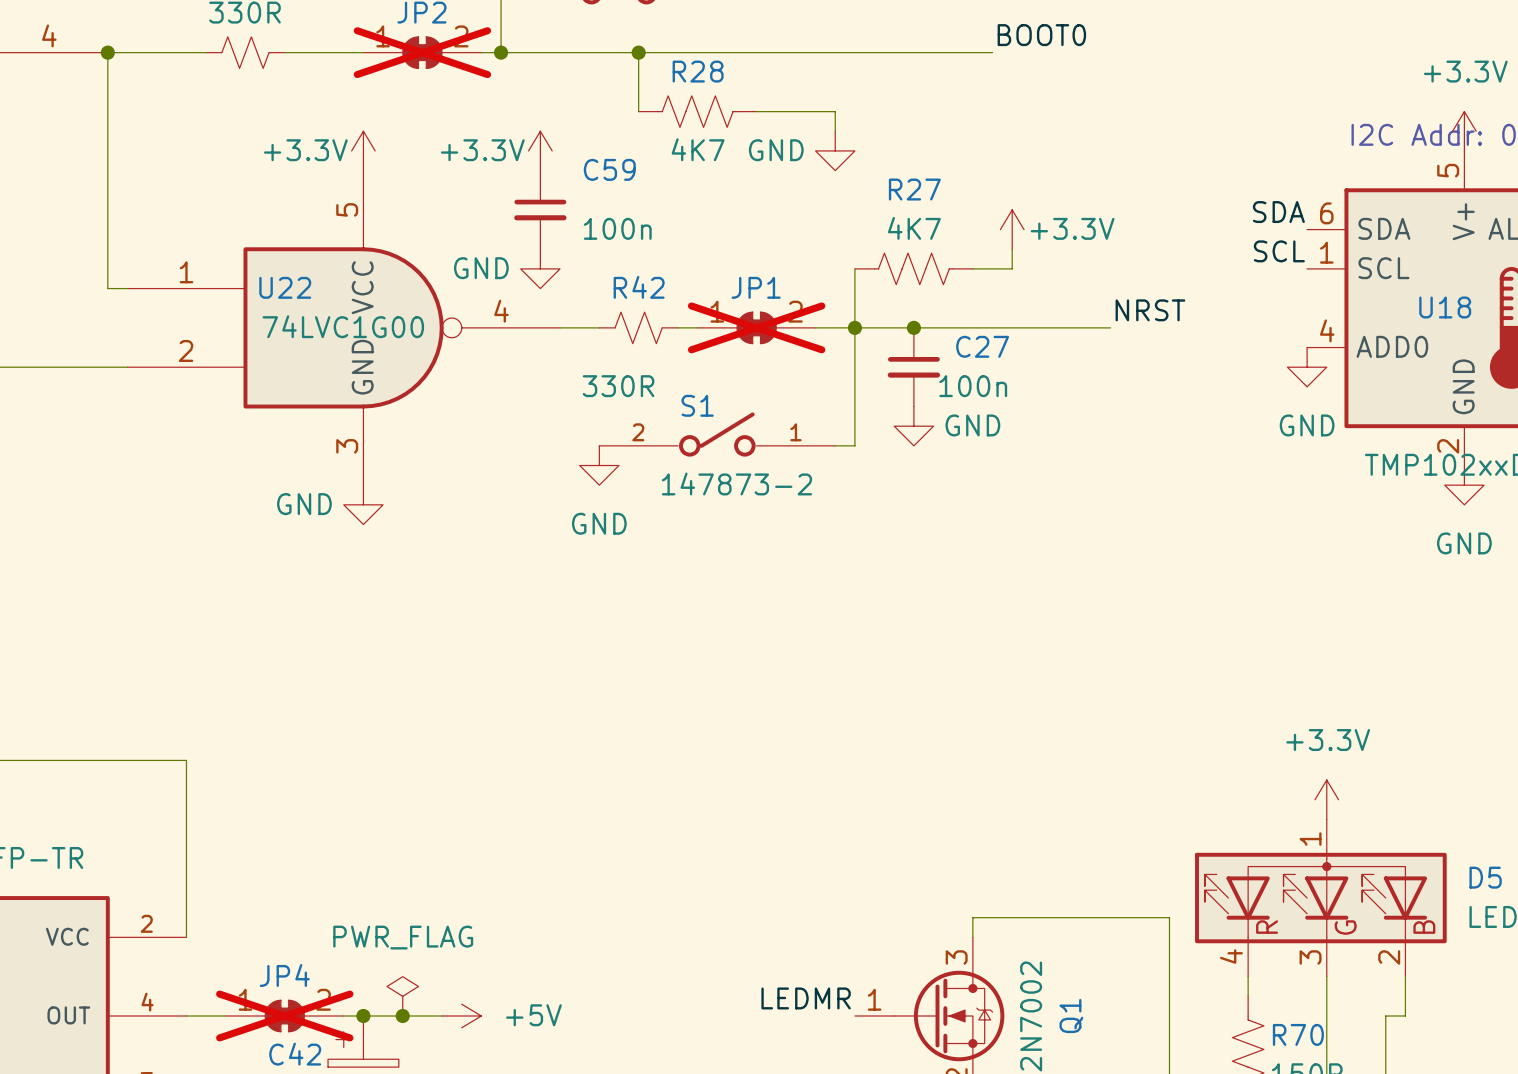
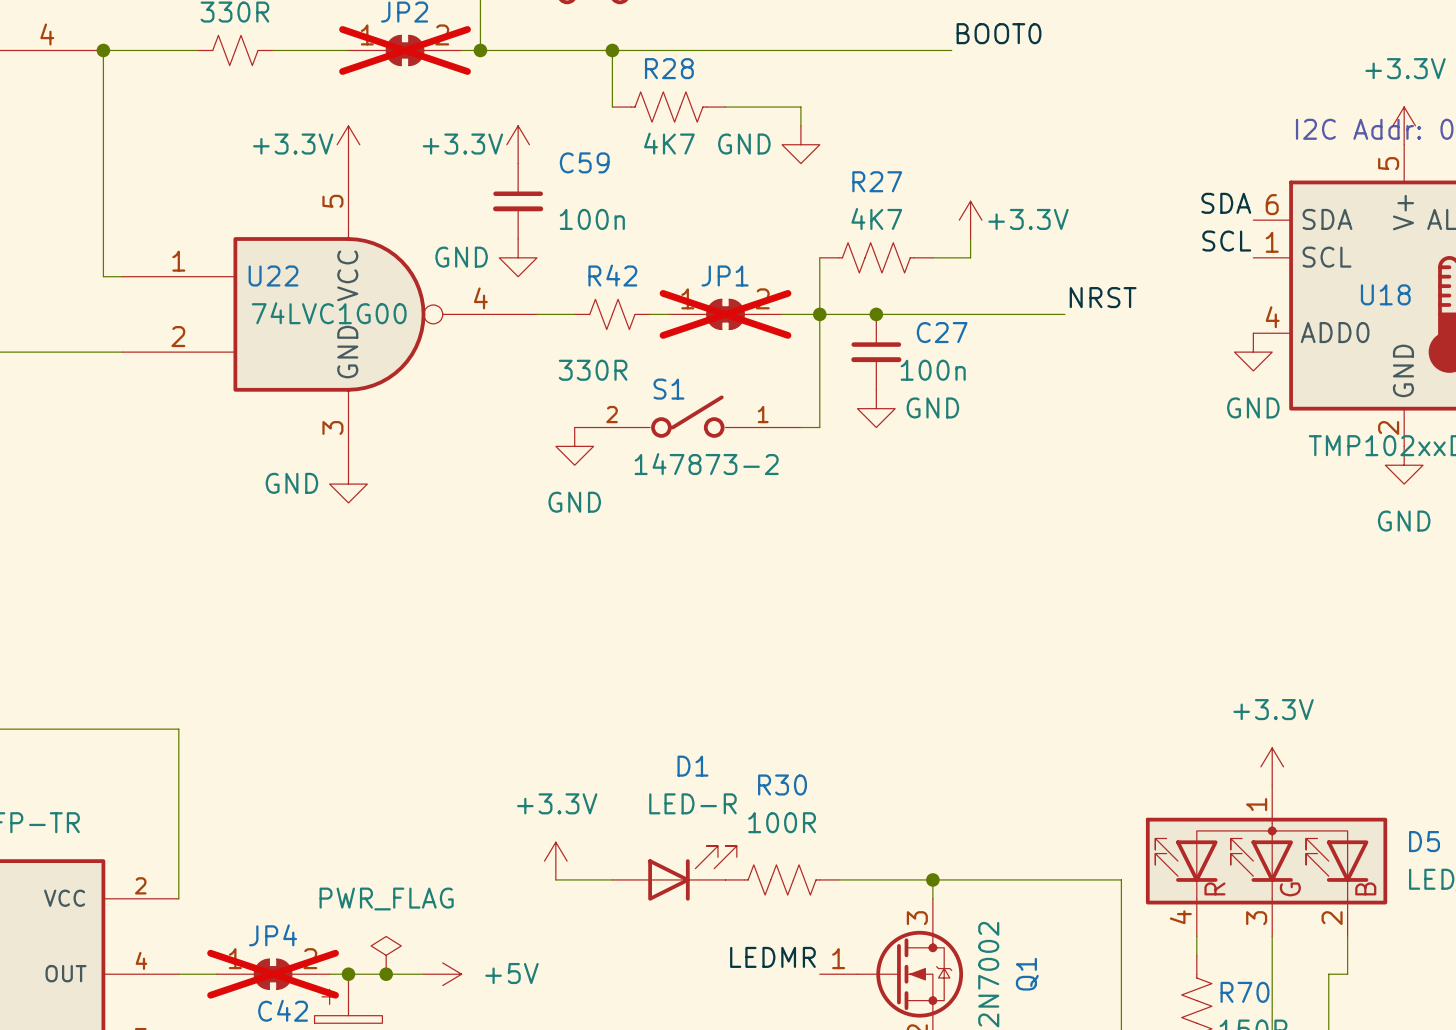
power symbol: none -> +3.3V (555, 861)
D1: none -> LED-R (674, 873)
wire: none -> (555, 879) (612, 879)
R30: none -> 100R (782, 879)
wire: none -> (838, 879) (932, 879)
junction: none -> (932, 879)

